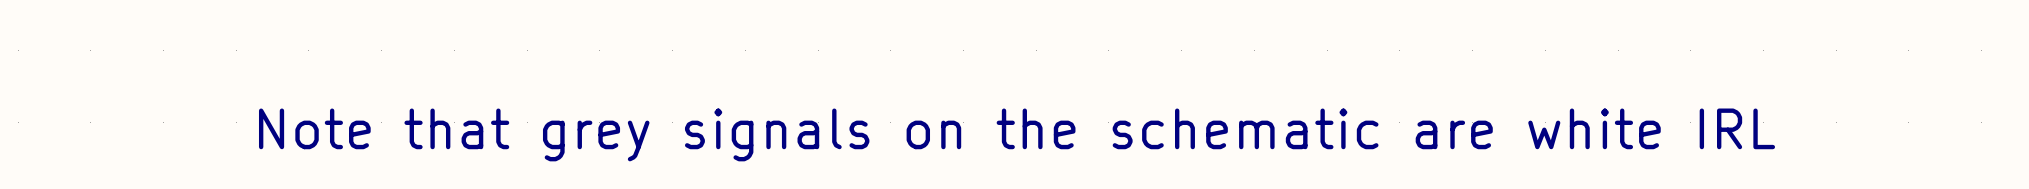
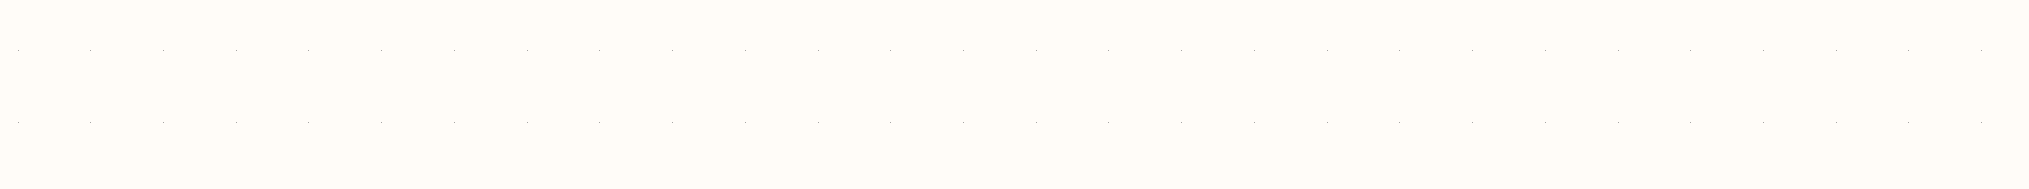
text: Note that grey signals on the schematic are white IRL (1017, 134) -> none

